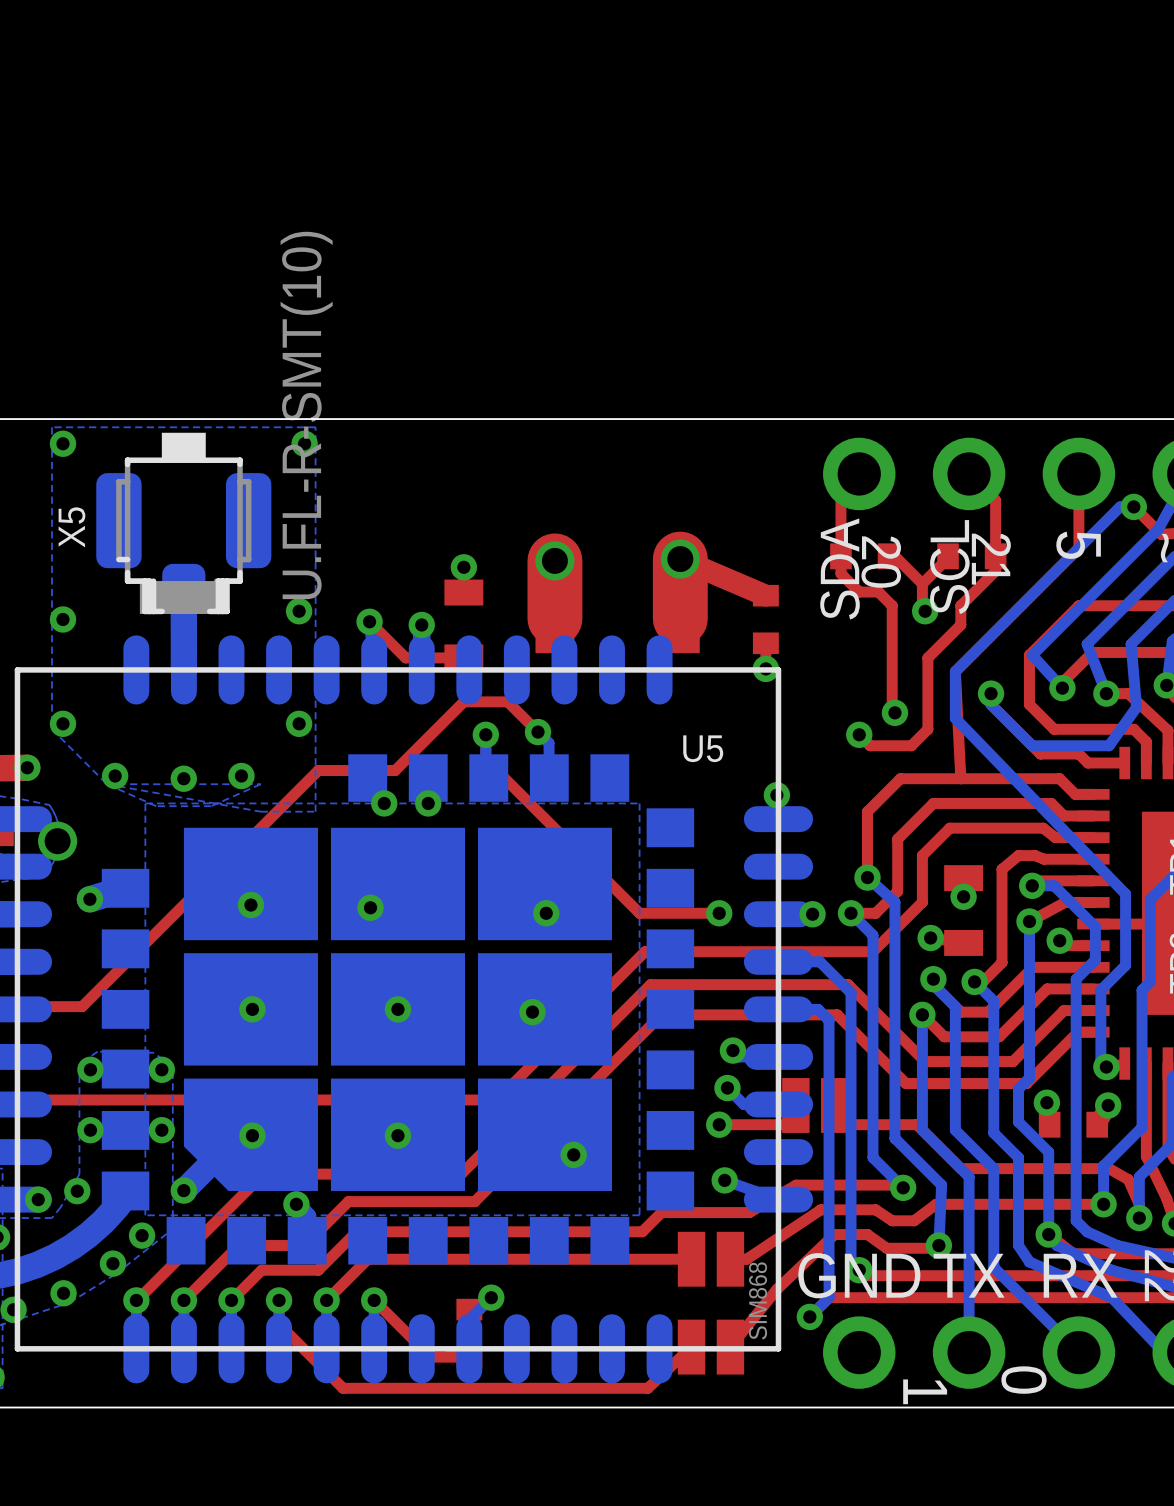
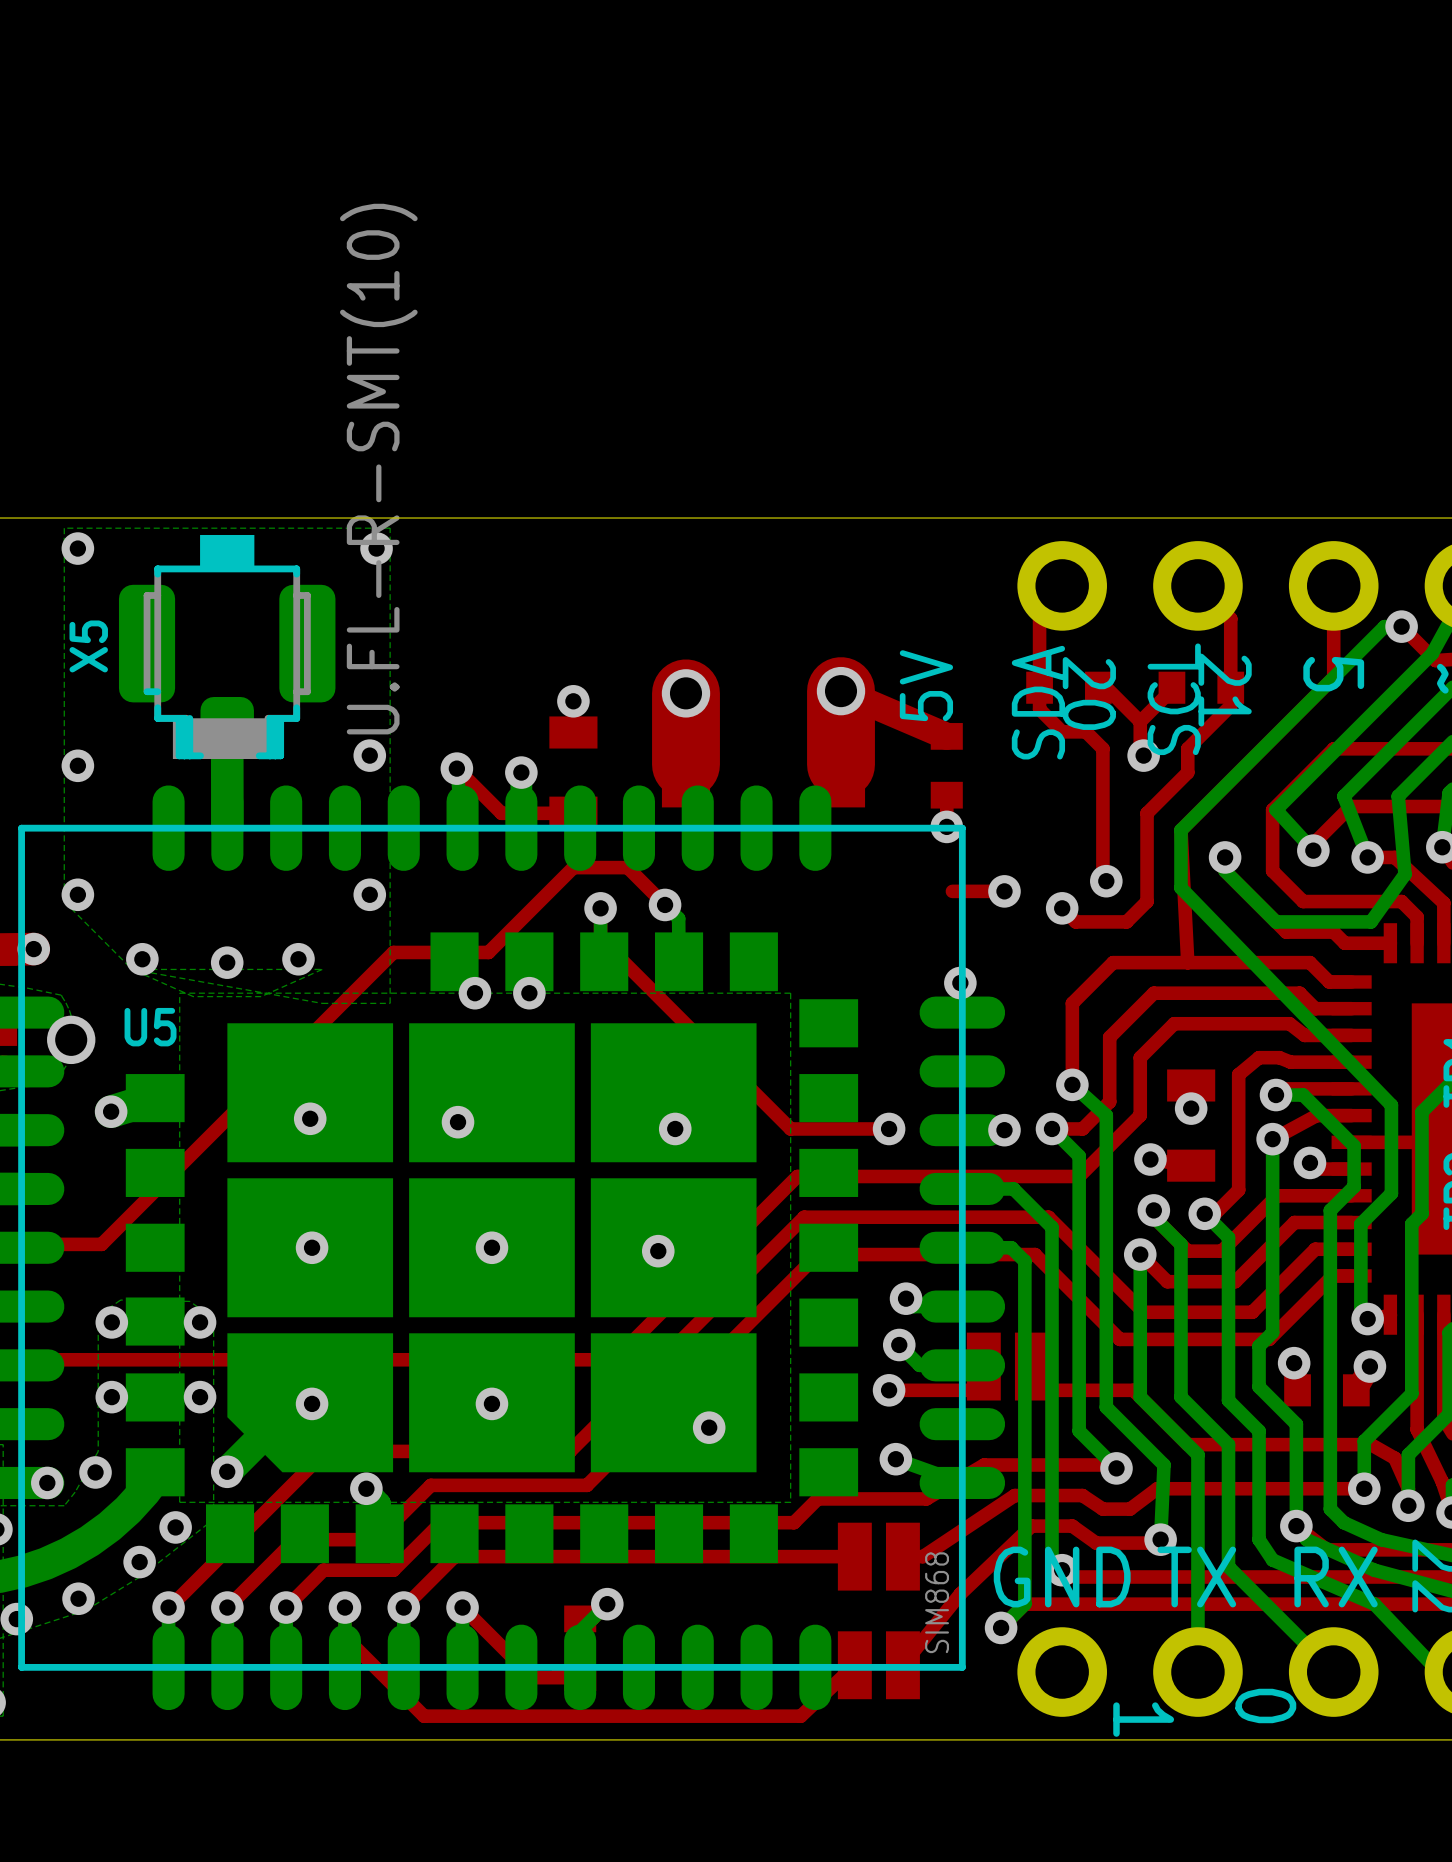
text: none -> 5V (926, 685)
top track: none -> (1004, 891) (952, 891)
via: none -> (1004, 891)
U5 name position: U5 (703, 748) -> U5 (150, 1027)

